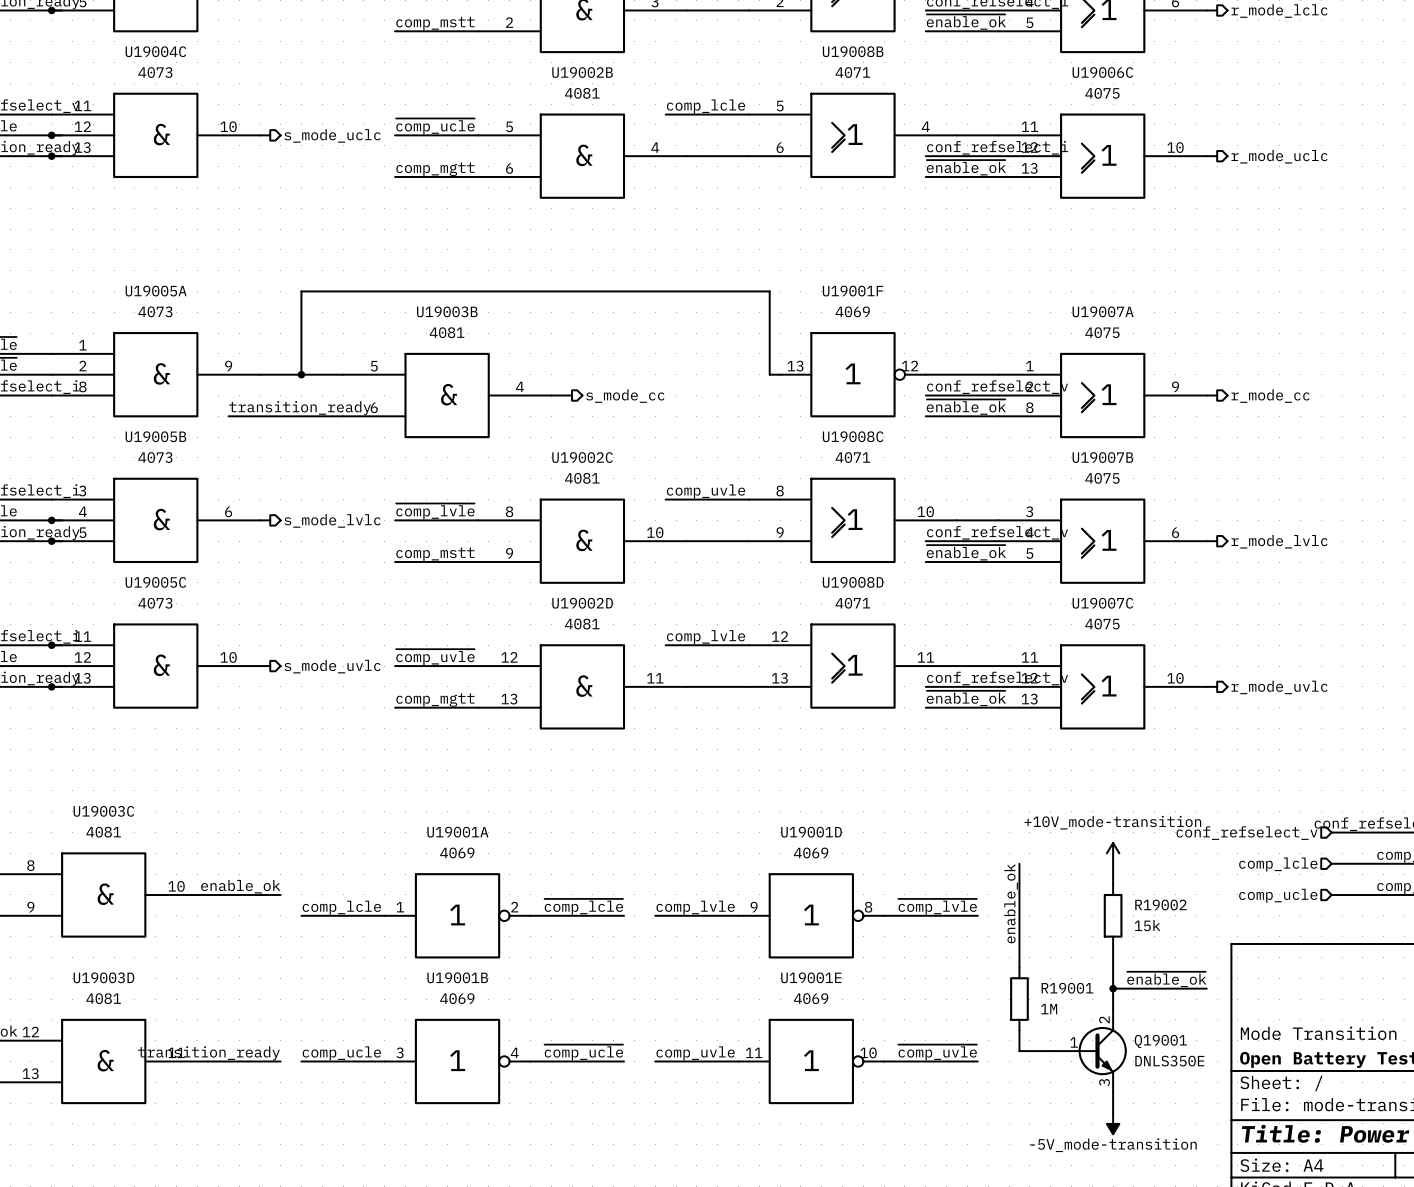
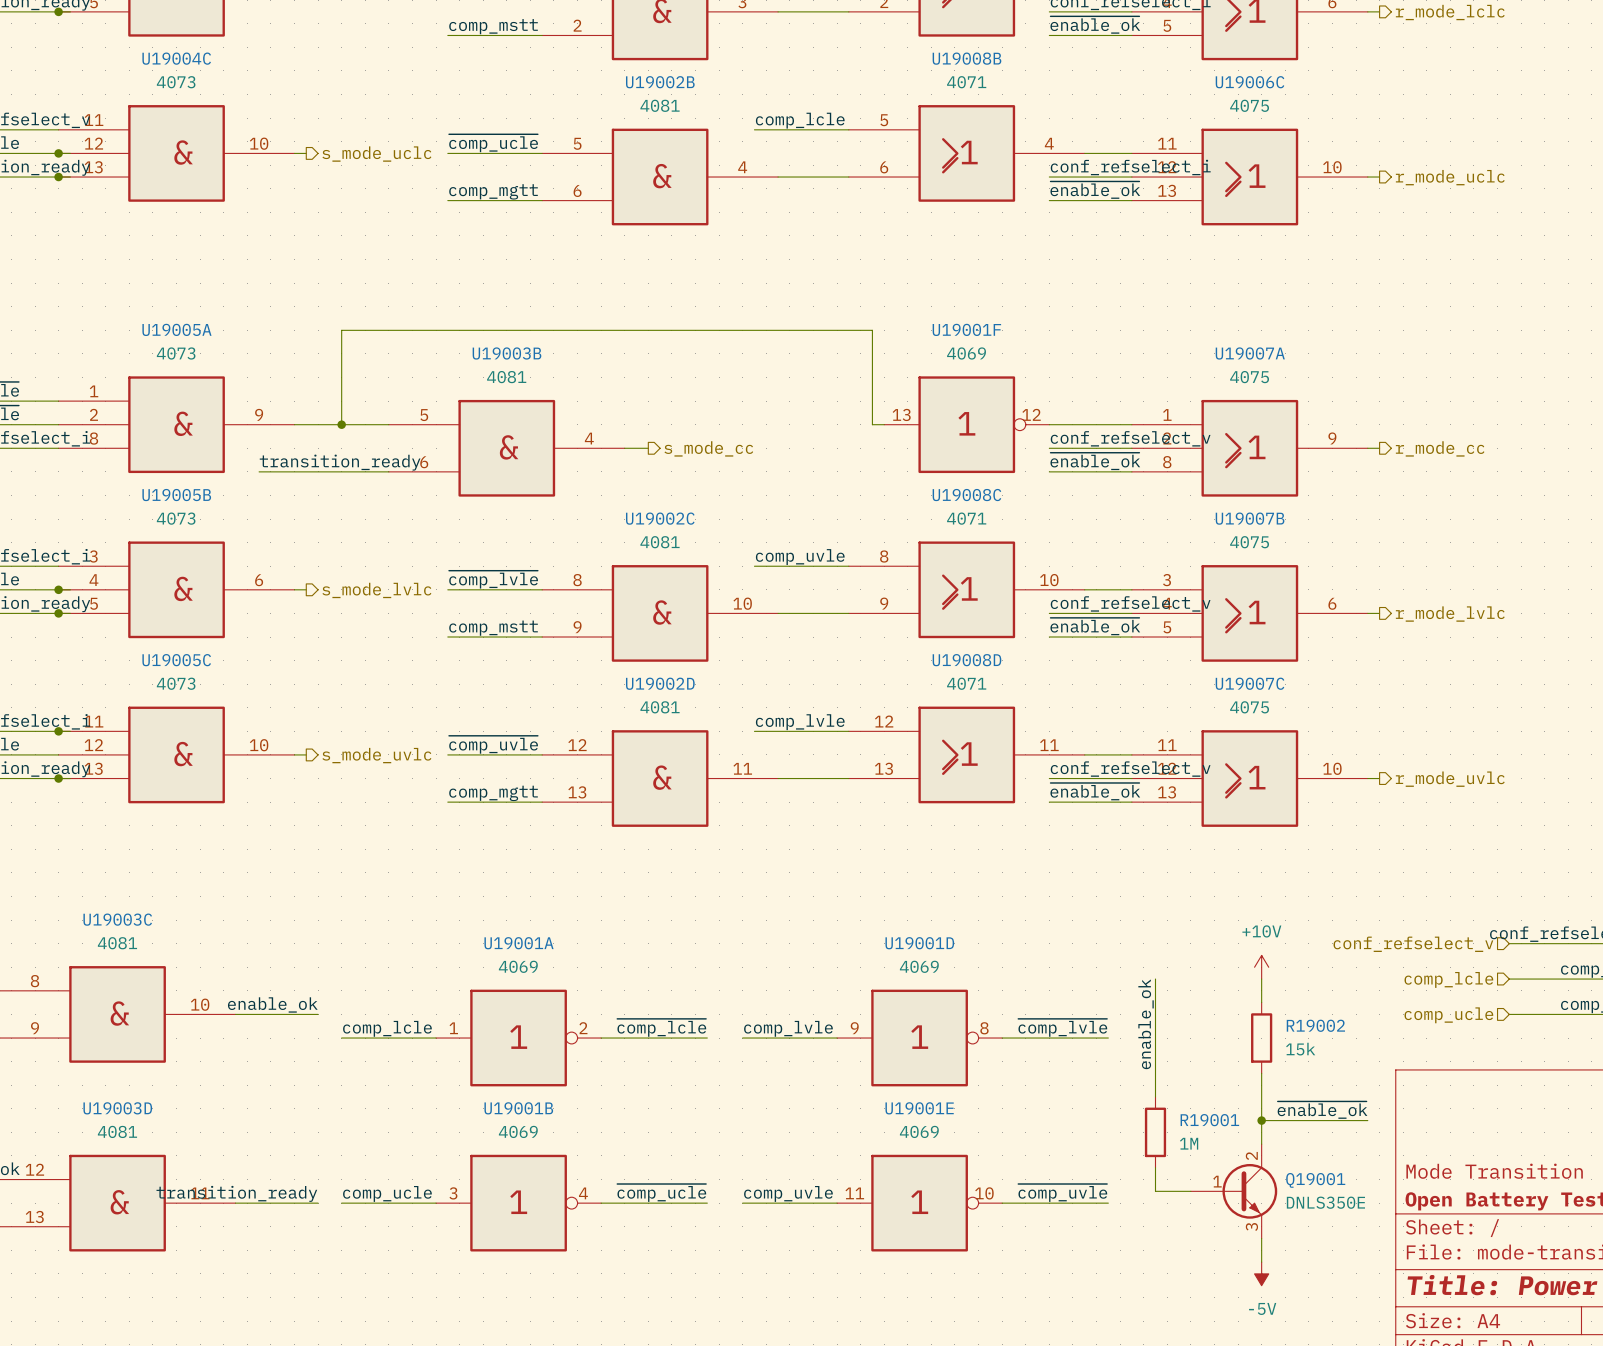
power symbol: +10V_mode-transition (1113, 853) -> +10V (1261, 967)
power symbol: -5V_mode-transition (1113, 1123) -> -5V (1261, 1273)

